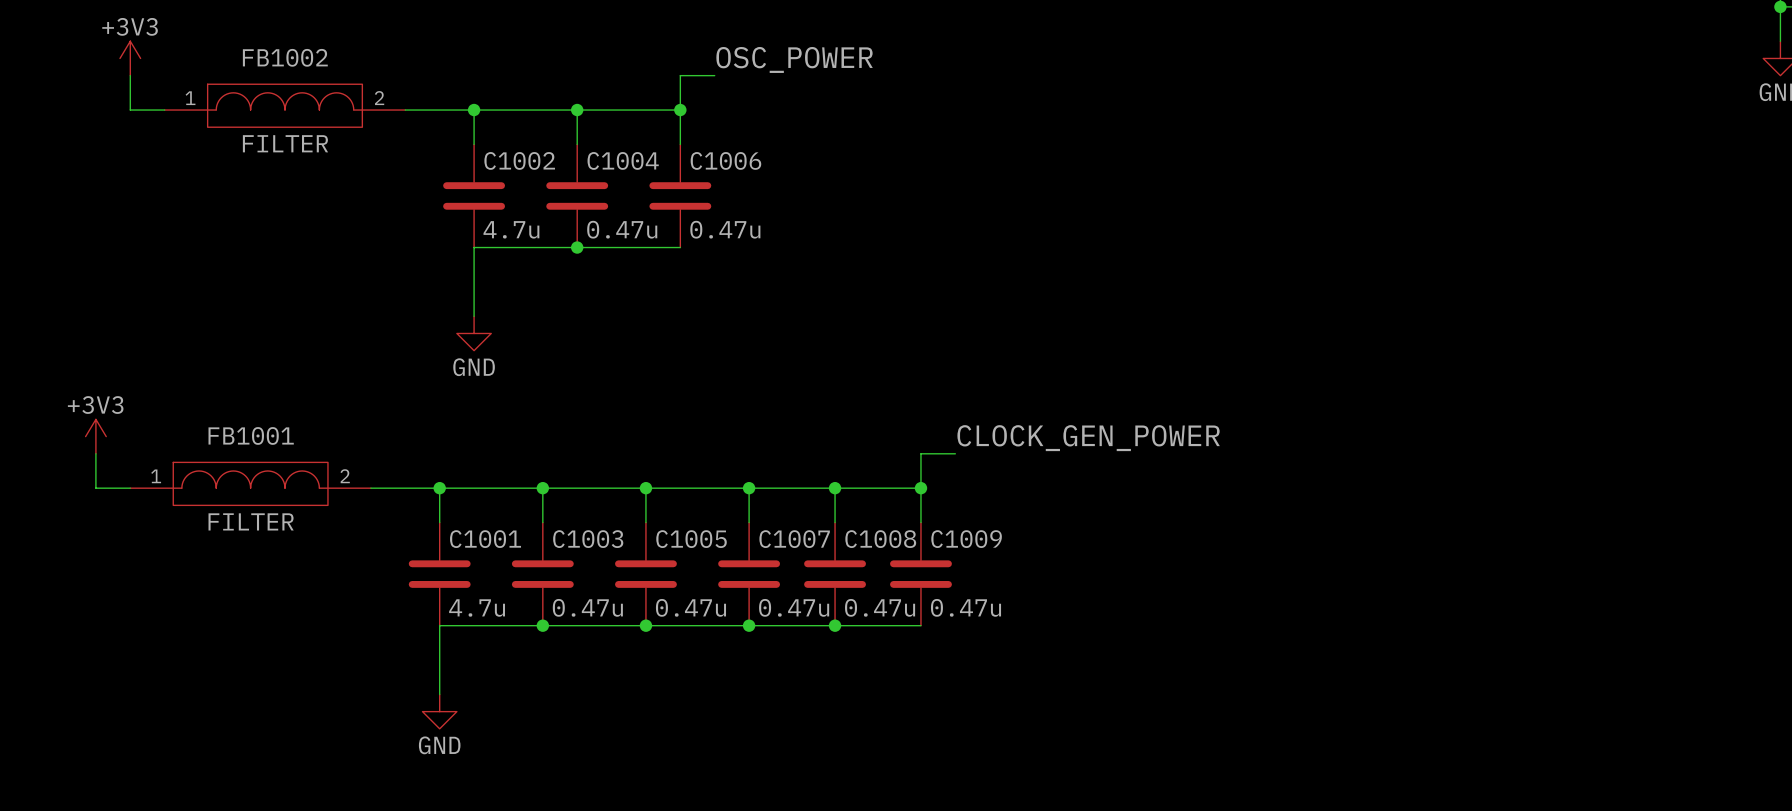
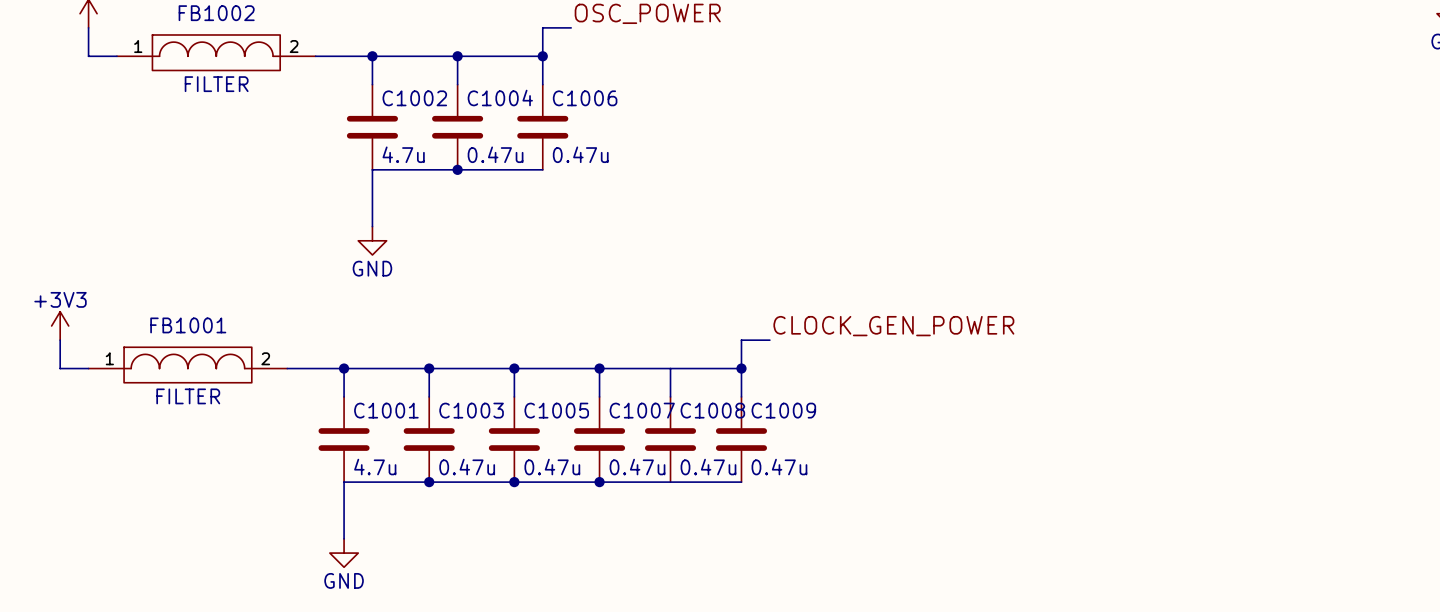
junction: (835, 488) -> none
junction: (835, 625) -> none

